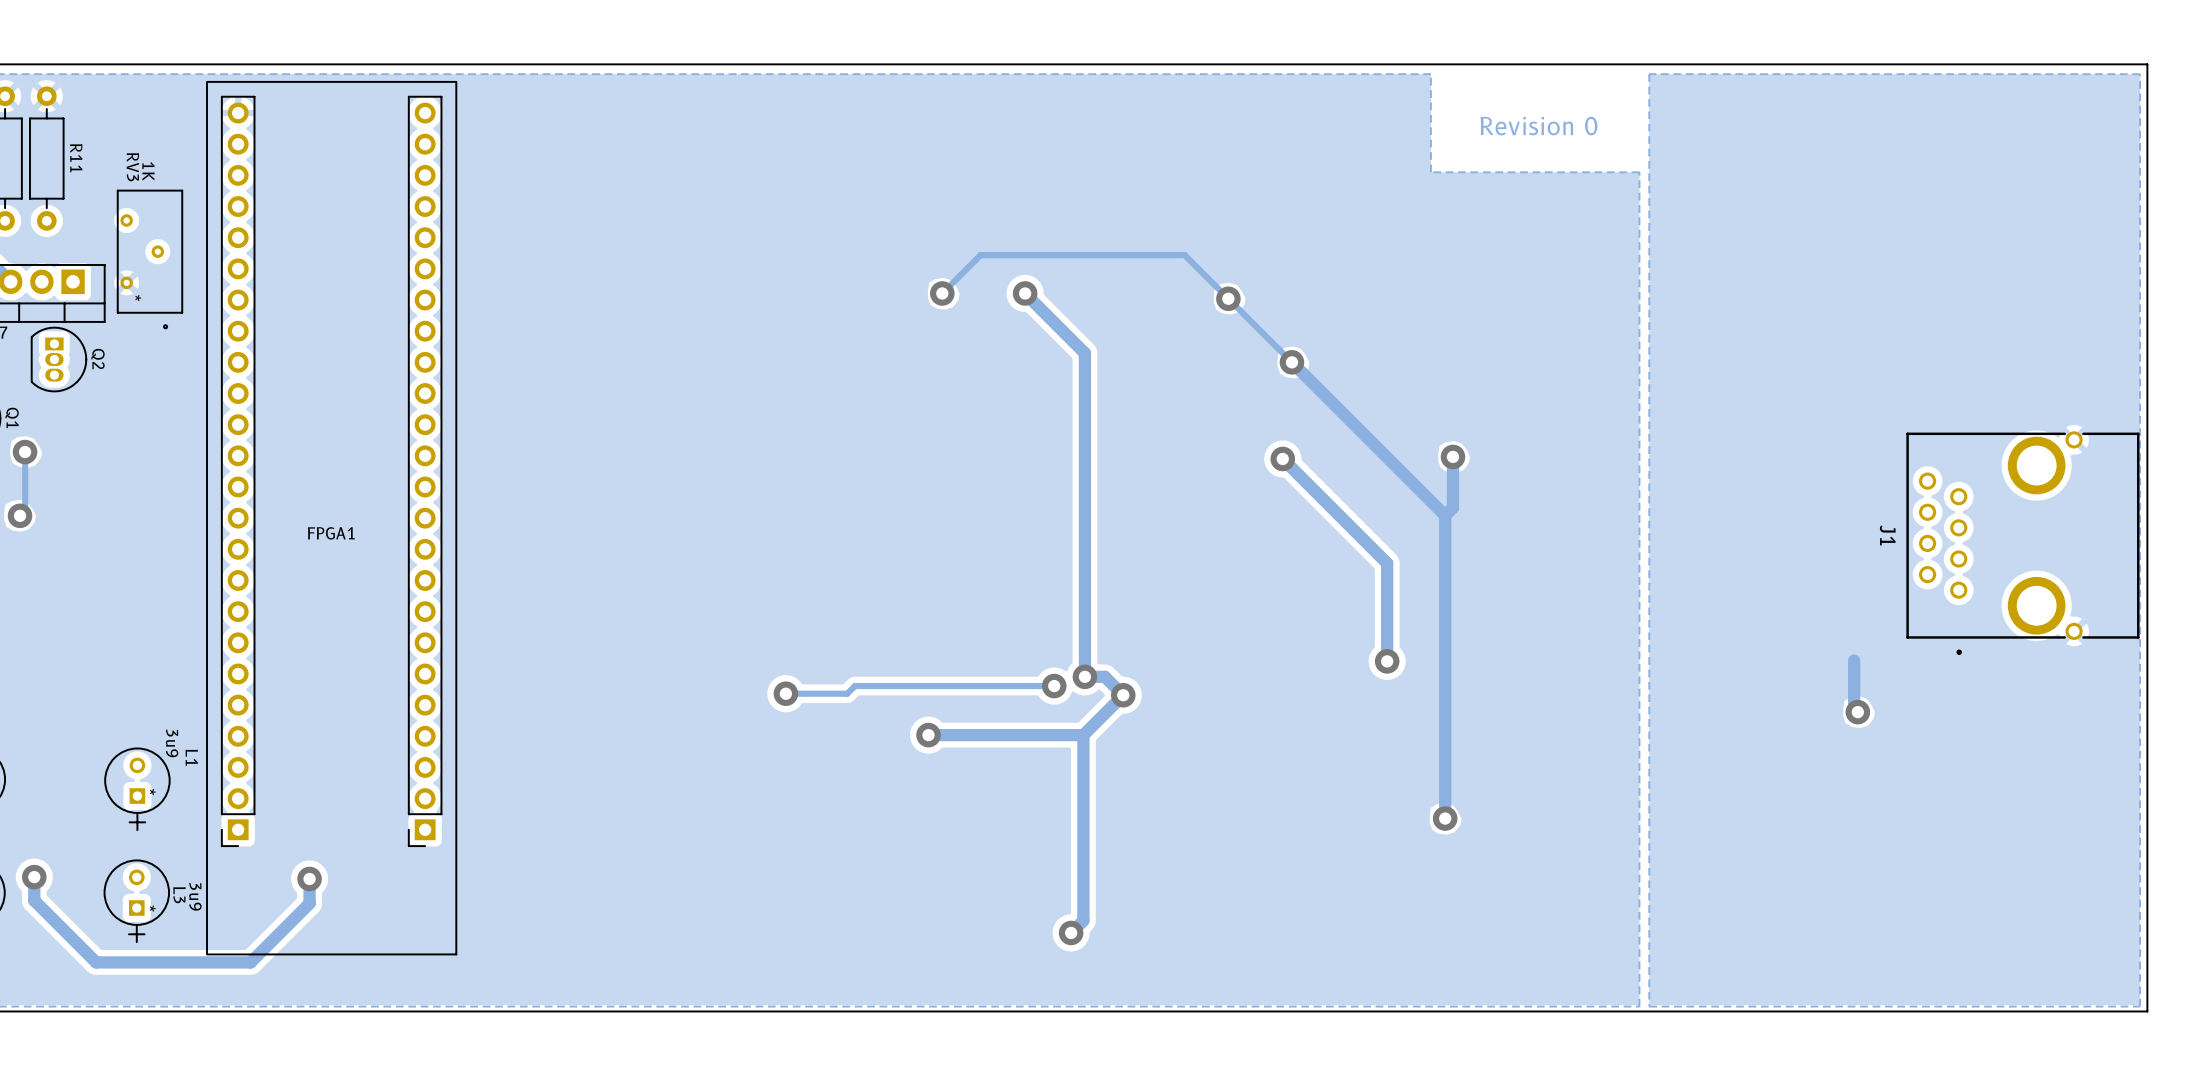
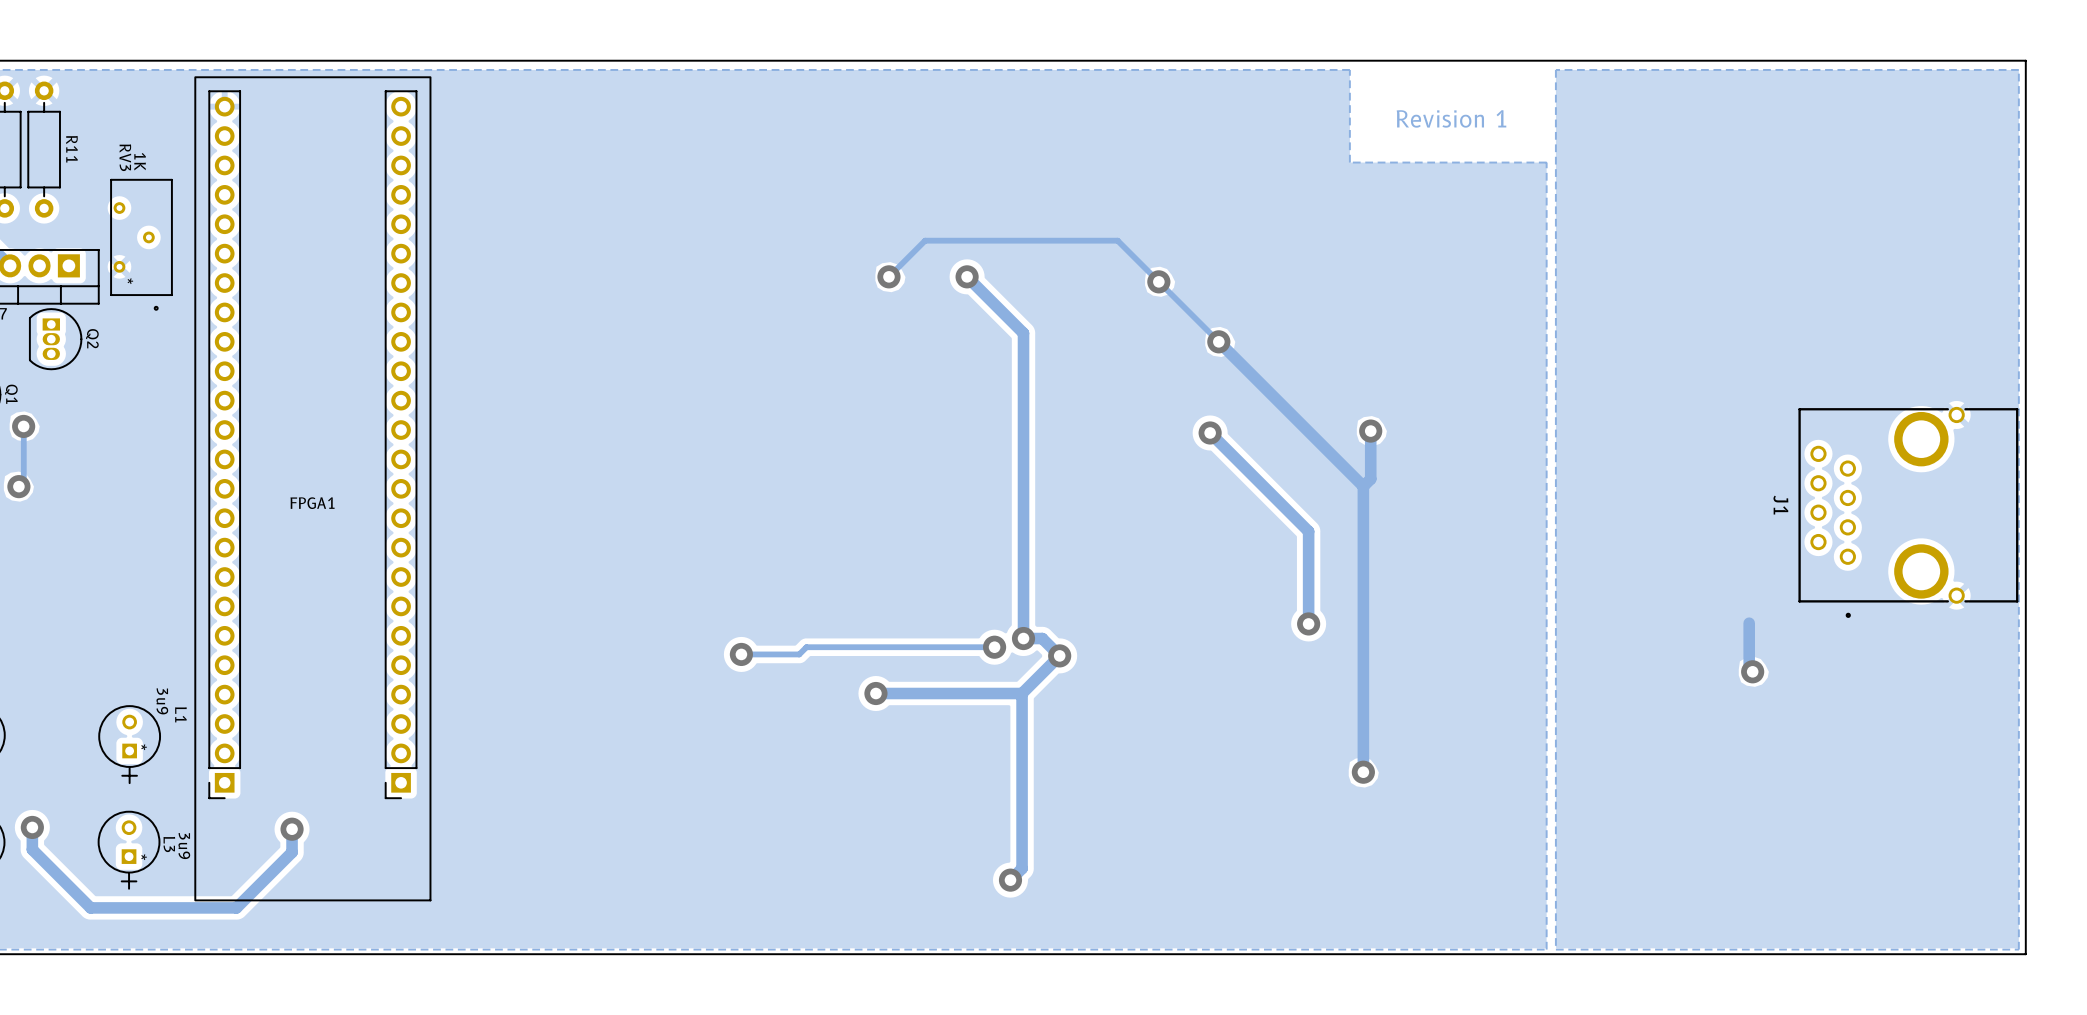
text: Revision 0 (1538, 126) -> Revision 1 (1451, 118)

